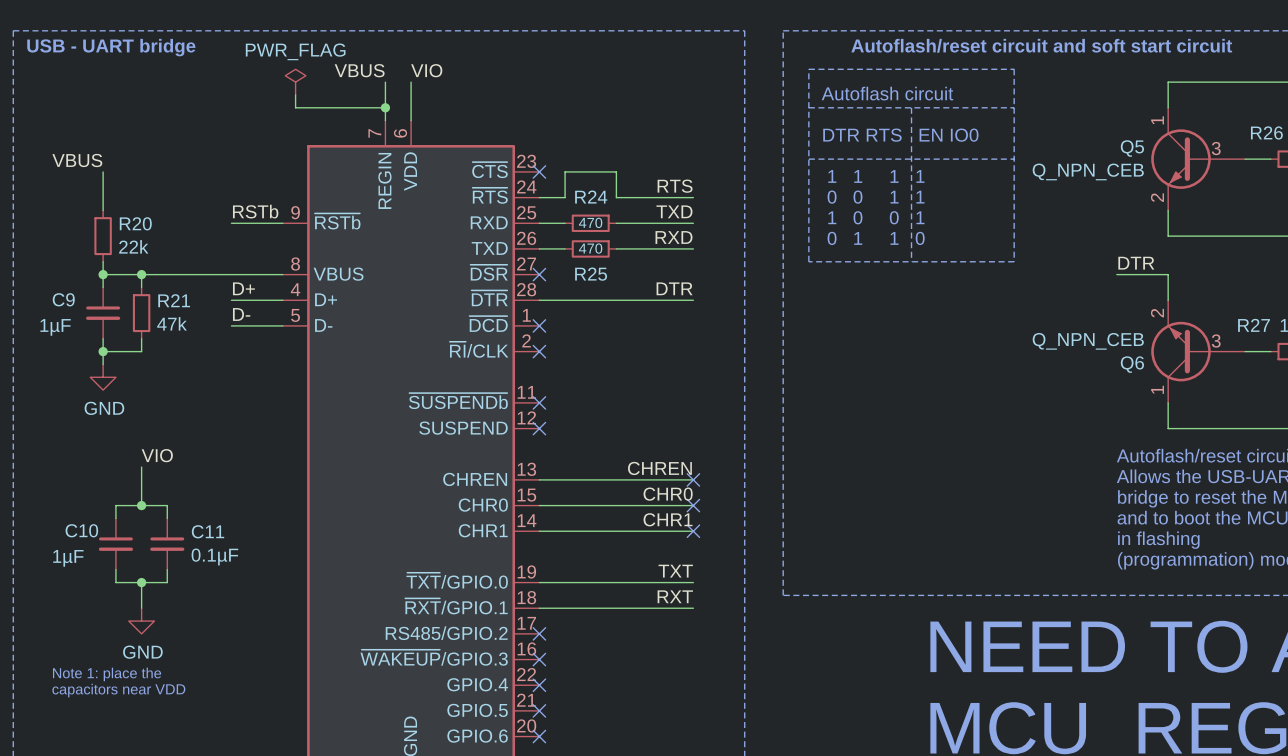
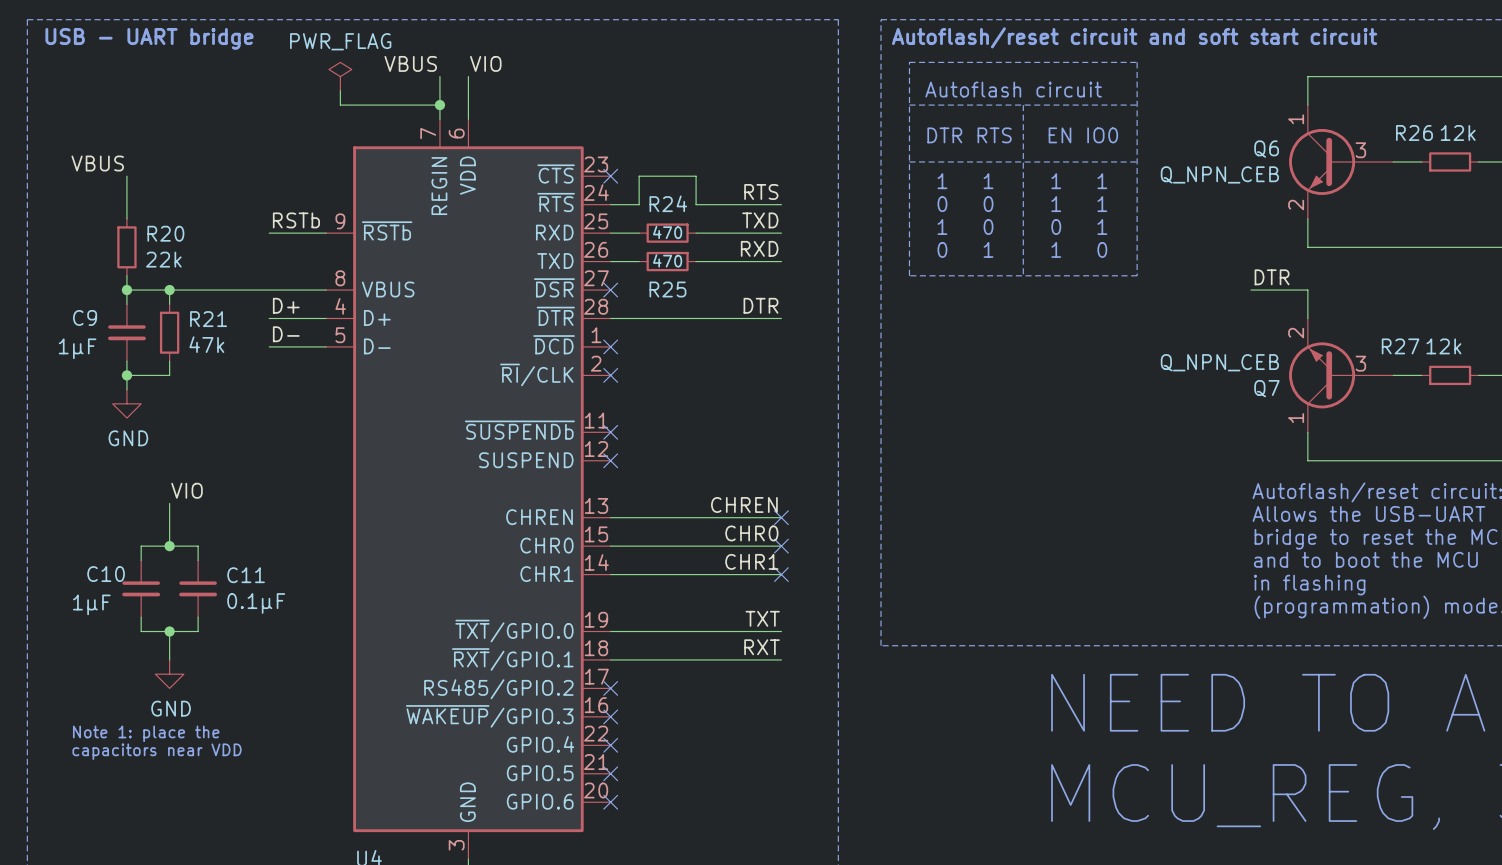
Q5 name: Q5 (1132, 148) -> Q6 (1266, 149)
Q6 name: Q6 (1132, 364) -> Q7 (1266, 388)

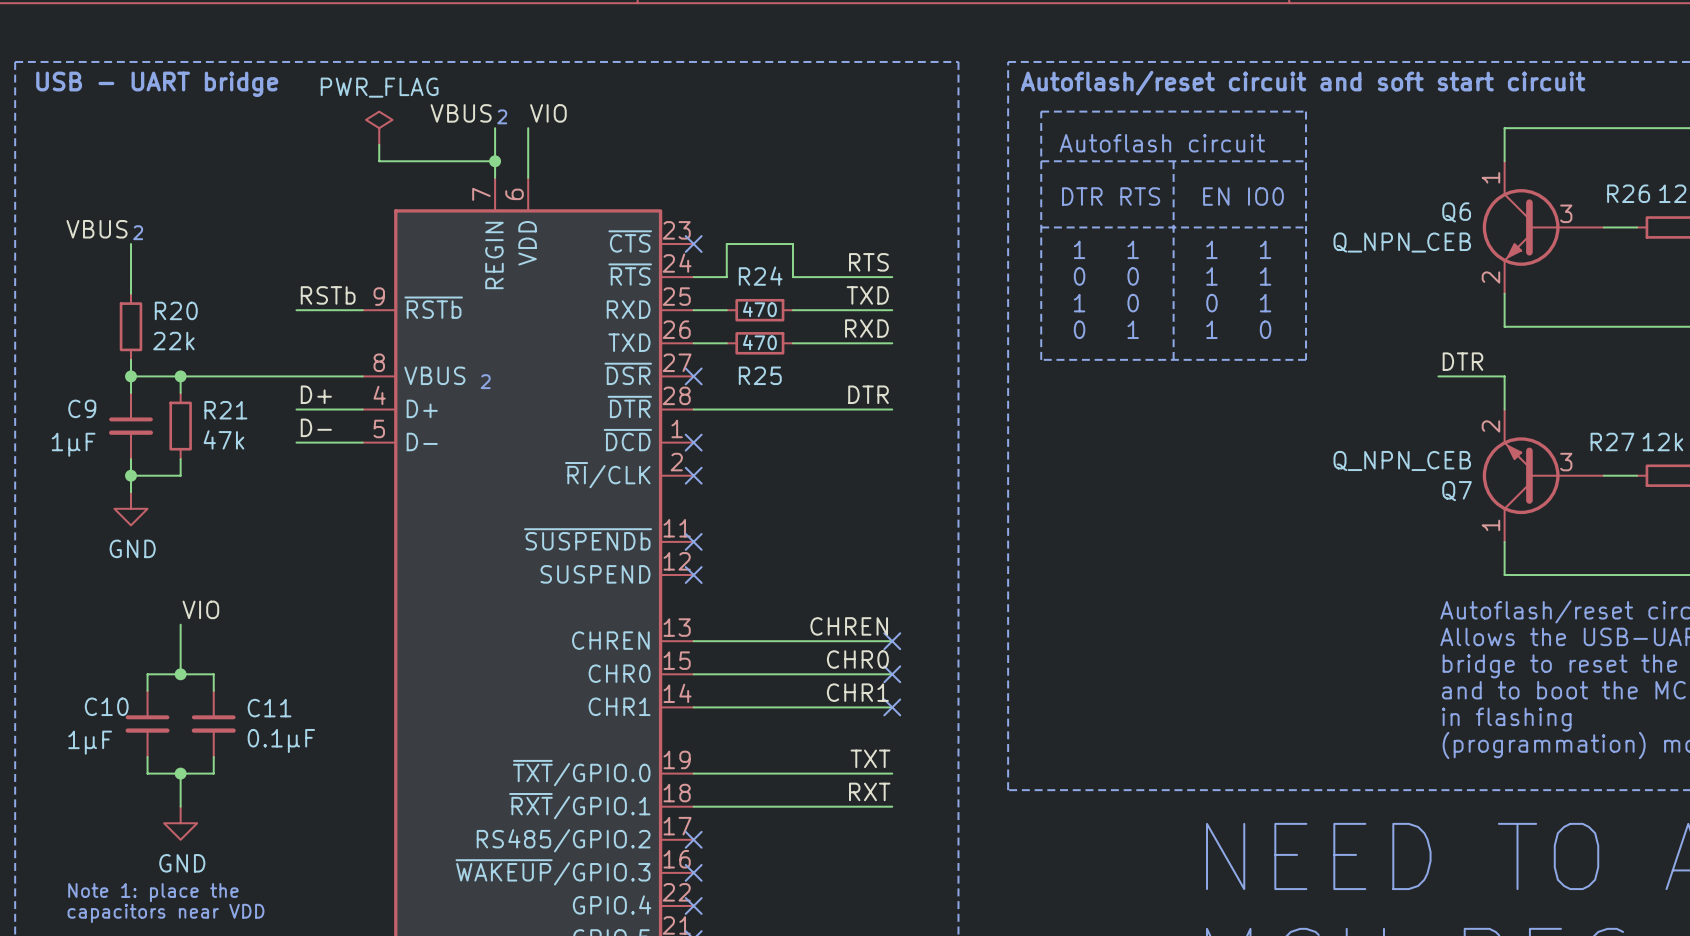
text: none -> 2 (502, 116)
text: none -> 2 (138, 232)
text: none -> 2 (485, 381)

